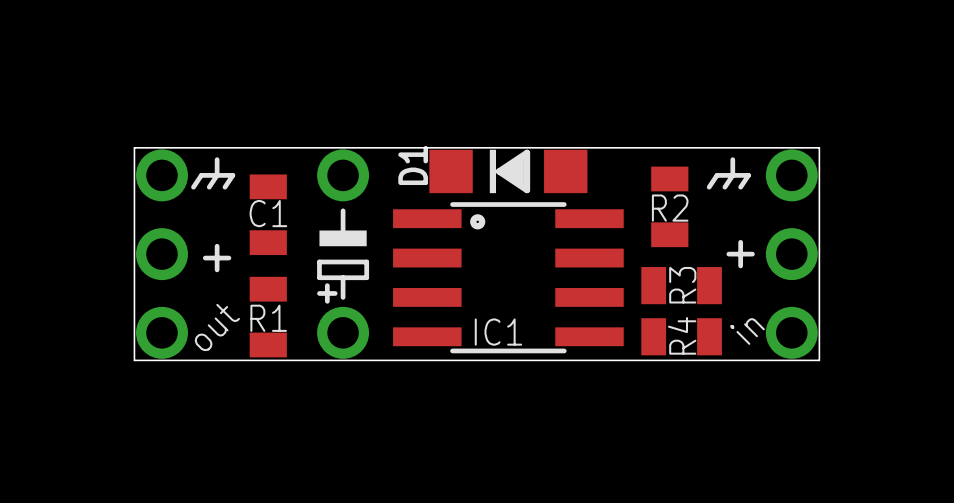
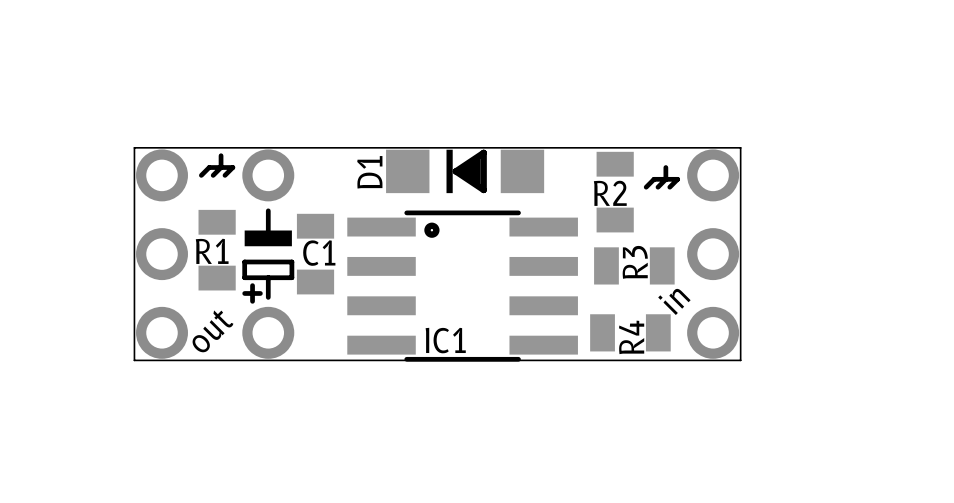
board edge: (740, 147) (819, 147) (819, 360) (740, 360) -> (740, 147) (740, 360)
line: none -> (221, 155) (221, 167) (213, 175)
line: (217, 159) (217, 175) (209, 187) -> none
line: (732, 159) (732, 175) (724, 187) -> none
line: none -> (665, 167) (665, 179) (657, 187)
D1 position: (508, 171) -> (465, 171)
line: none -> (201, 175) (209, 167) (232, 167) (224, 175)
line: (193, 187) (201, 175) (232, 175) (224, 187) -> none
line: none -> (646, 187) (654, 179) (677, 179) (669, 187)
line: (709, 187) (717, 175) (748, 175) (740, 187) -> none
R2 position: (669, 206) -> (615, 192)
C1 position: (268, 214) -> (315, 254)
line: (740, 242) (740, 265) -> none
line: (217, 246) (217, 269) -> none
part position: (343, 254) -> (268, 254)
line: (728, 254) (752, 254) -> none
part position: (791, 254) -> (713, 254)
line: (205, 258) (228, 258) -> none
IC1 position: (508, 277) -> (462, 286)
R3 position: (681, 285) -> (634, 265)
R3 name position: R3 (682, 285) -> R3 (635, 262)
R1 position: (268, 317) -> (217, 250)
text position: in (747, 331) -> in (674, 301)
R4 position: (681, 336) -> (630, 332)

